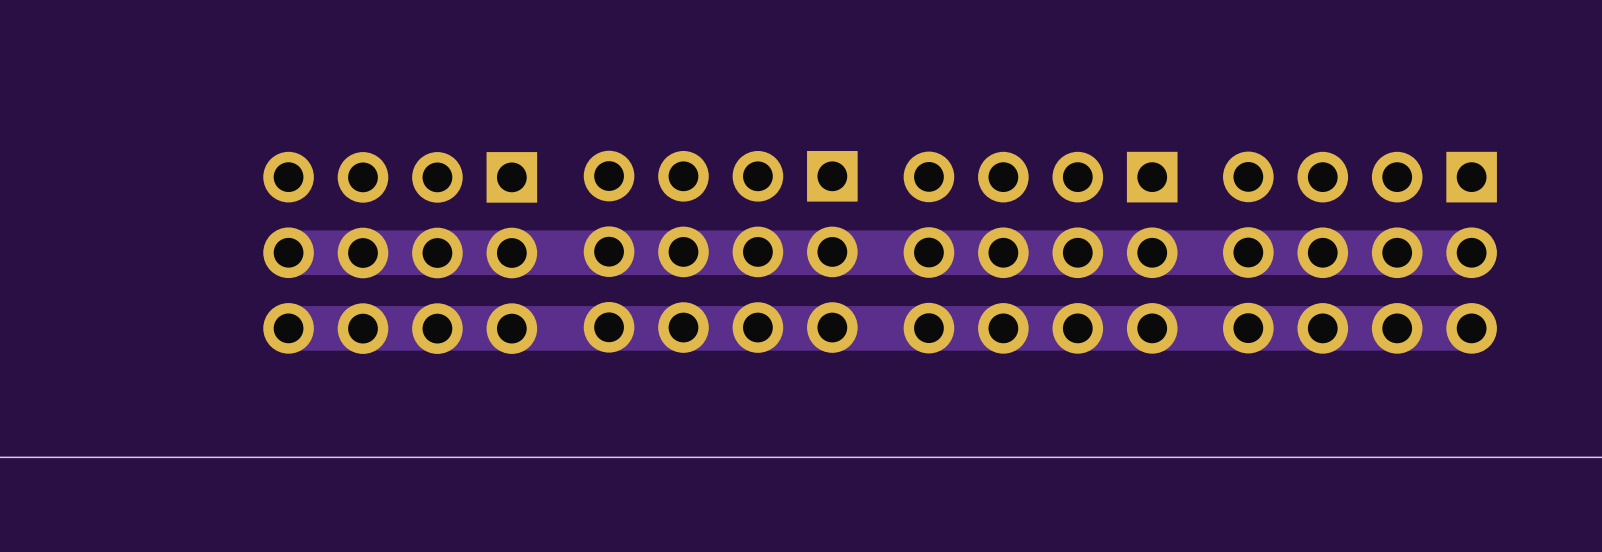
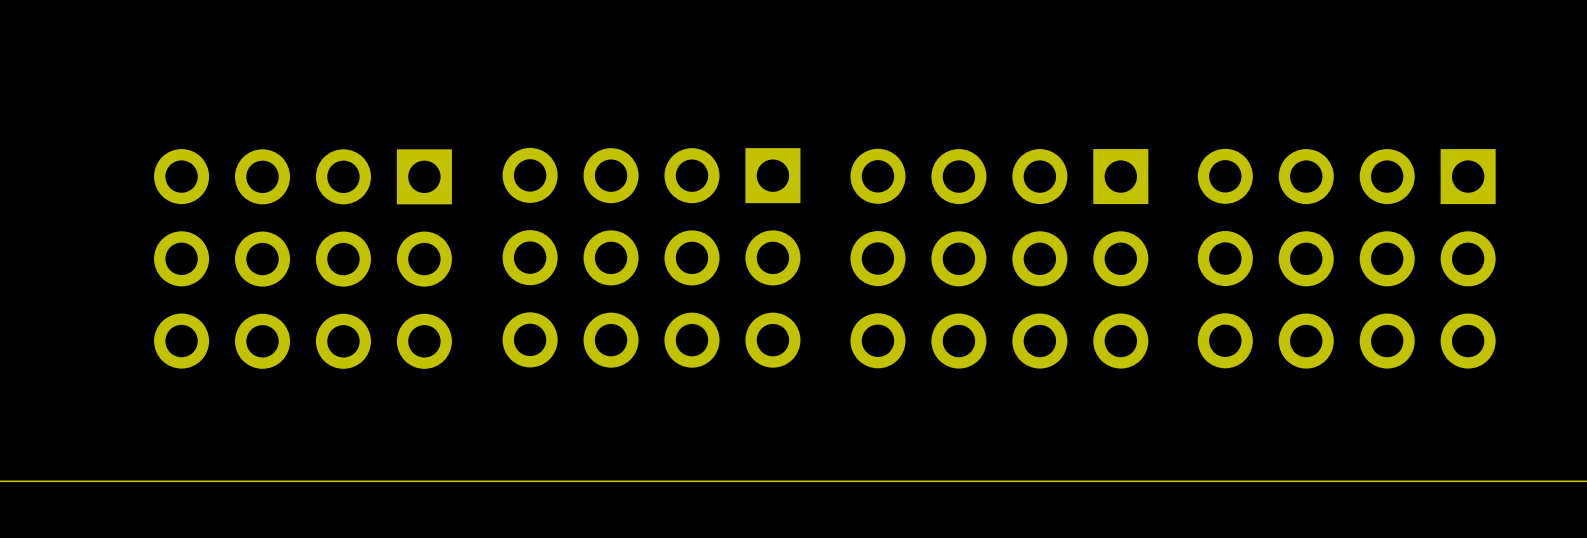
track: (1471, 252) (288, 252) -> none
track: (1471, 328) (288, 328) -> none

